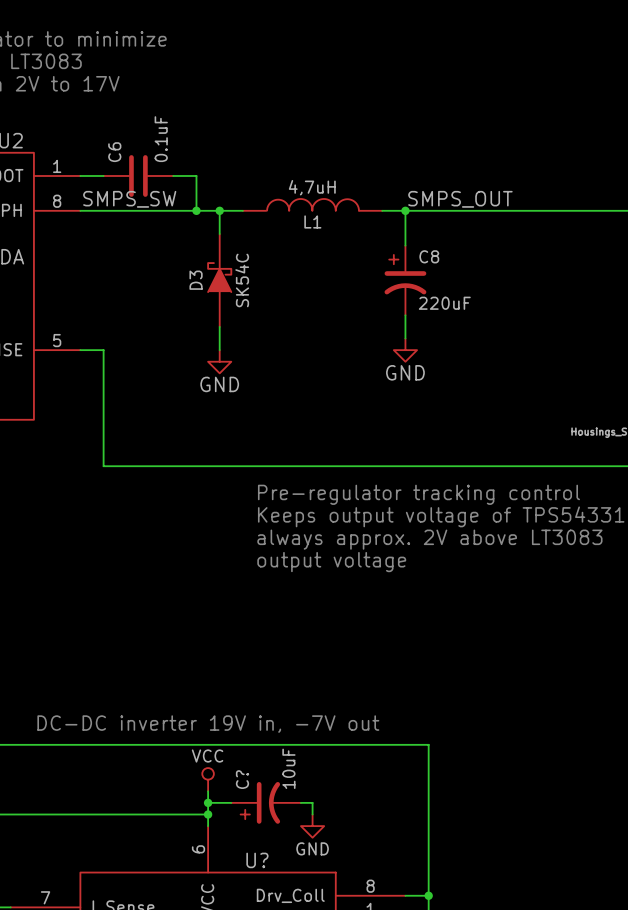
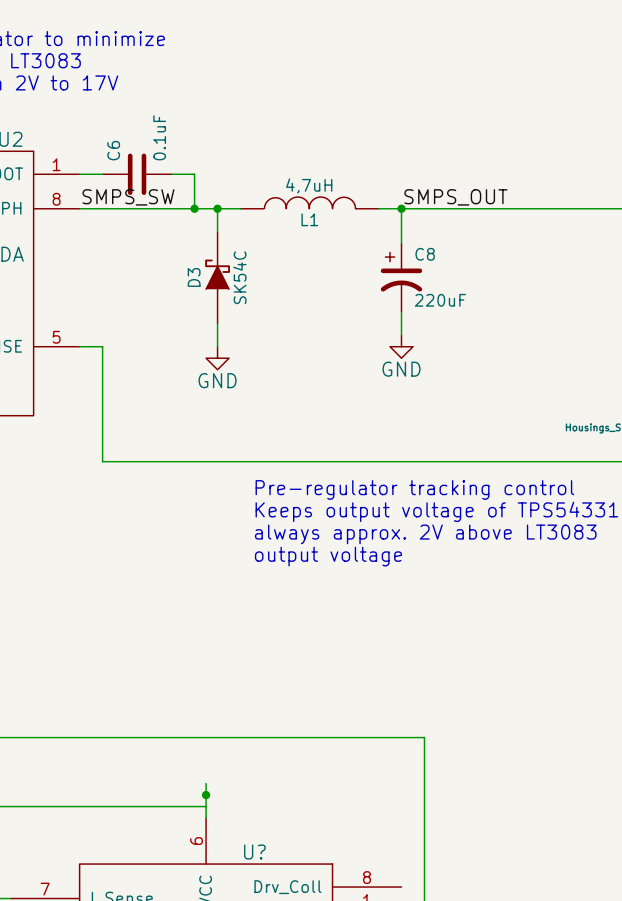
text: DC-DC inverter 19V in, -7V out (208, 724) -> none
power symbol: VCC (208, 779) -> none
wire: (208, 802) (231, 802) -> none
C?: 10uF (266, 802) -> none
wire: (300, 802) (312, 802) (312, 814) -> none
junction: (208, 814) -> none
power symbol: GND (312, 826) -> none
wire: (405, 895) (428, 895) -> none
junction: (428, 895) -> none

